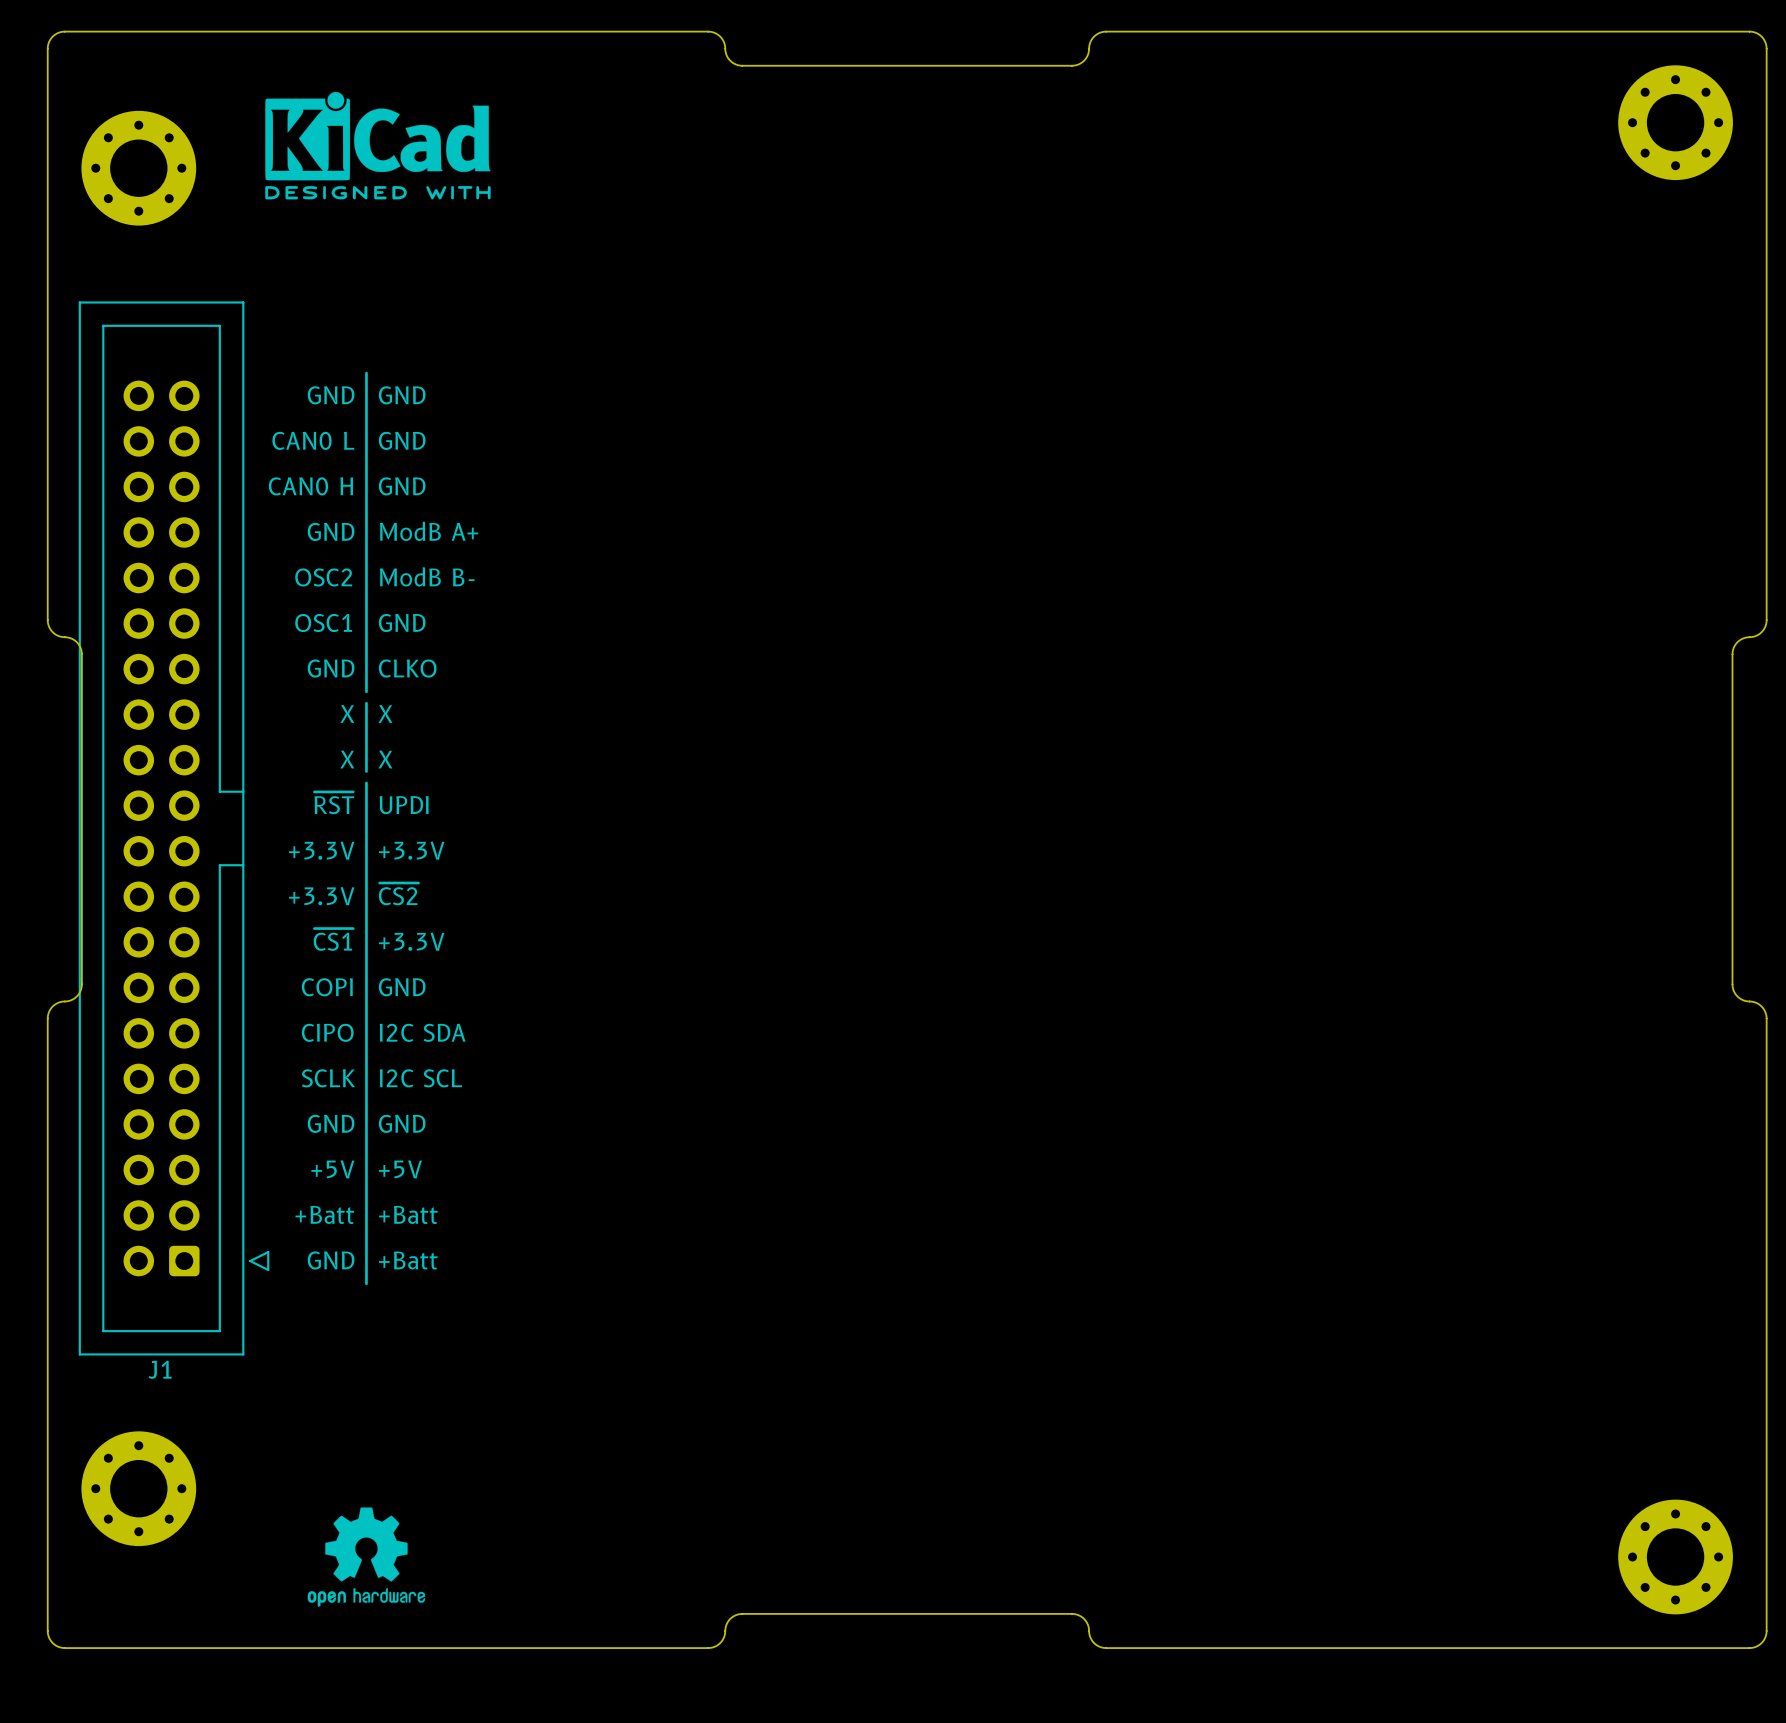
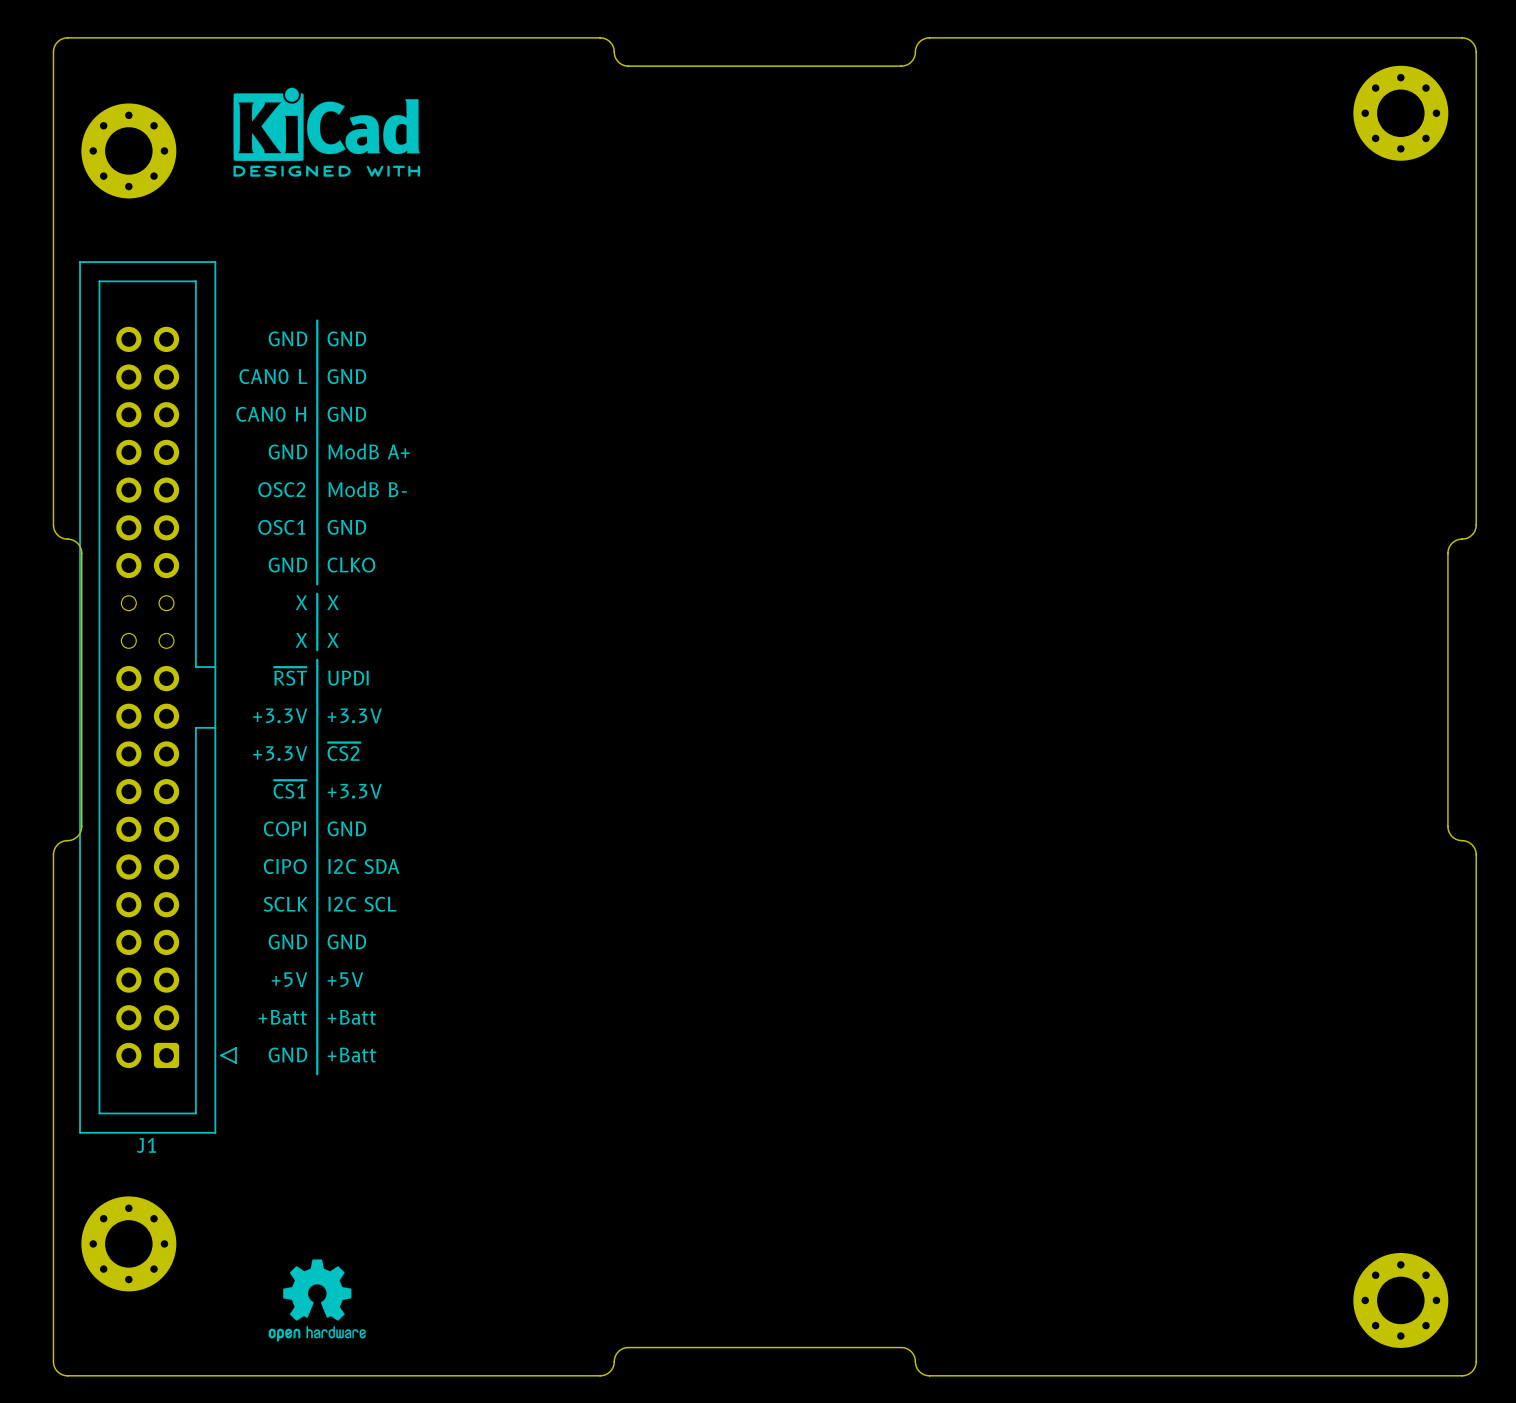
J1 footprint: [78, 301, 270, 1356] -> [79, 261, 237, 1134]

